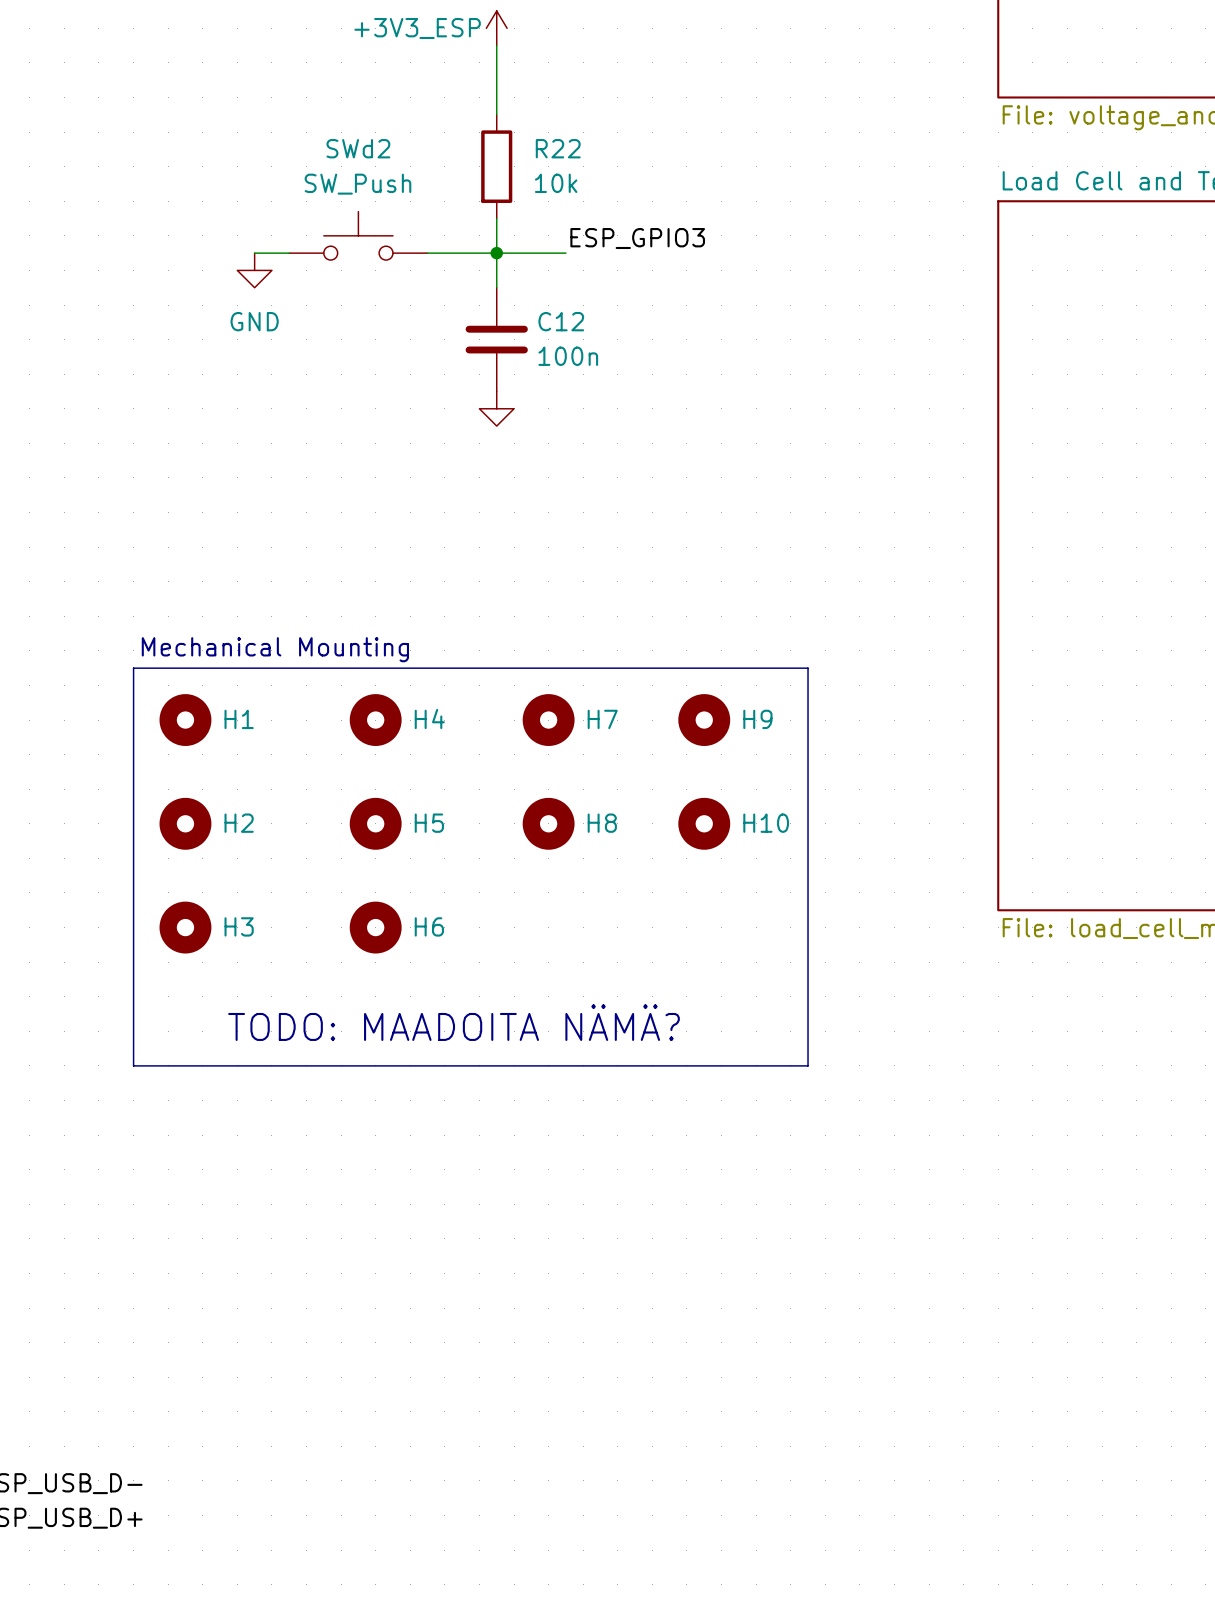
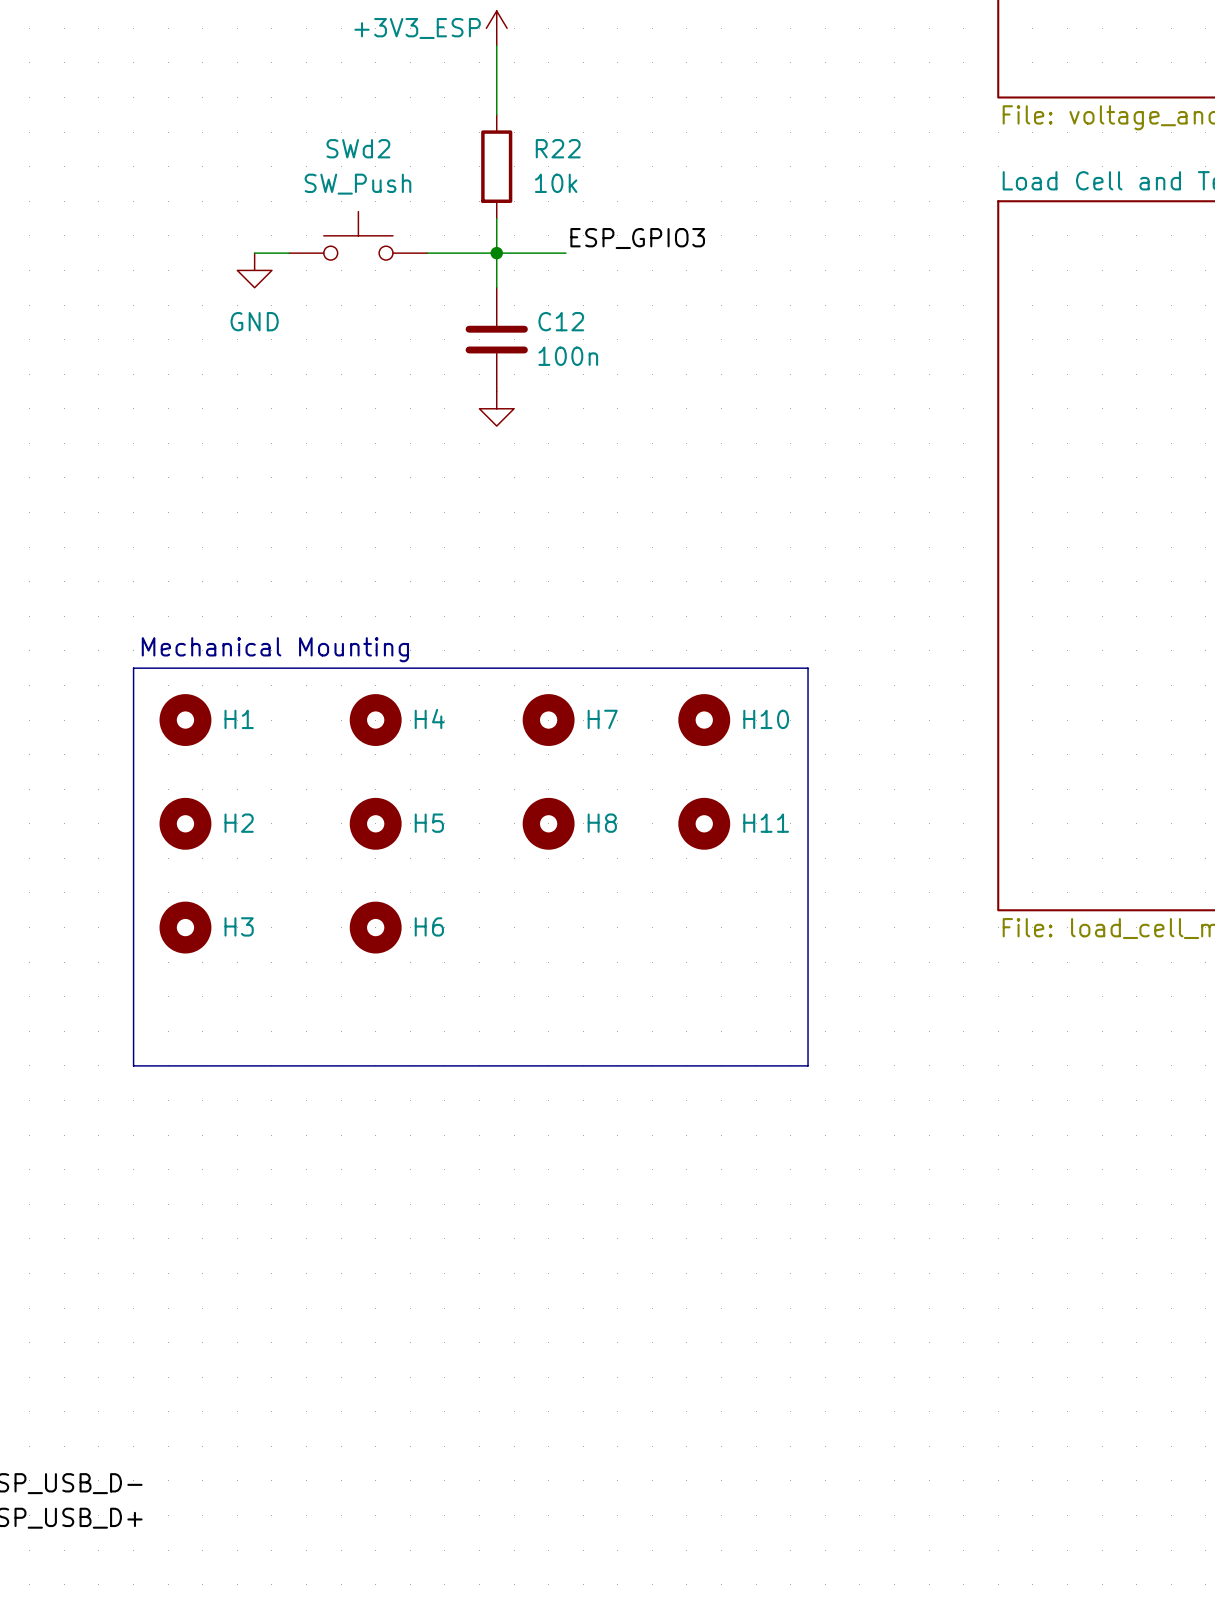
H9 name: H9 (757, 719) -> H10 (766, 719)
H10 name: H10 (766, 823) -> H11 (766, 823)
text: TODO: MAADOITA NÄMÄ? (454, 1022) -> none

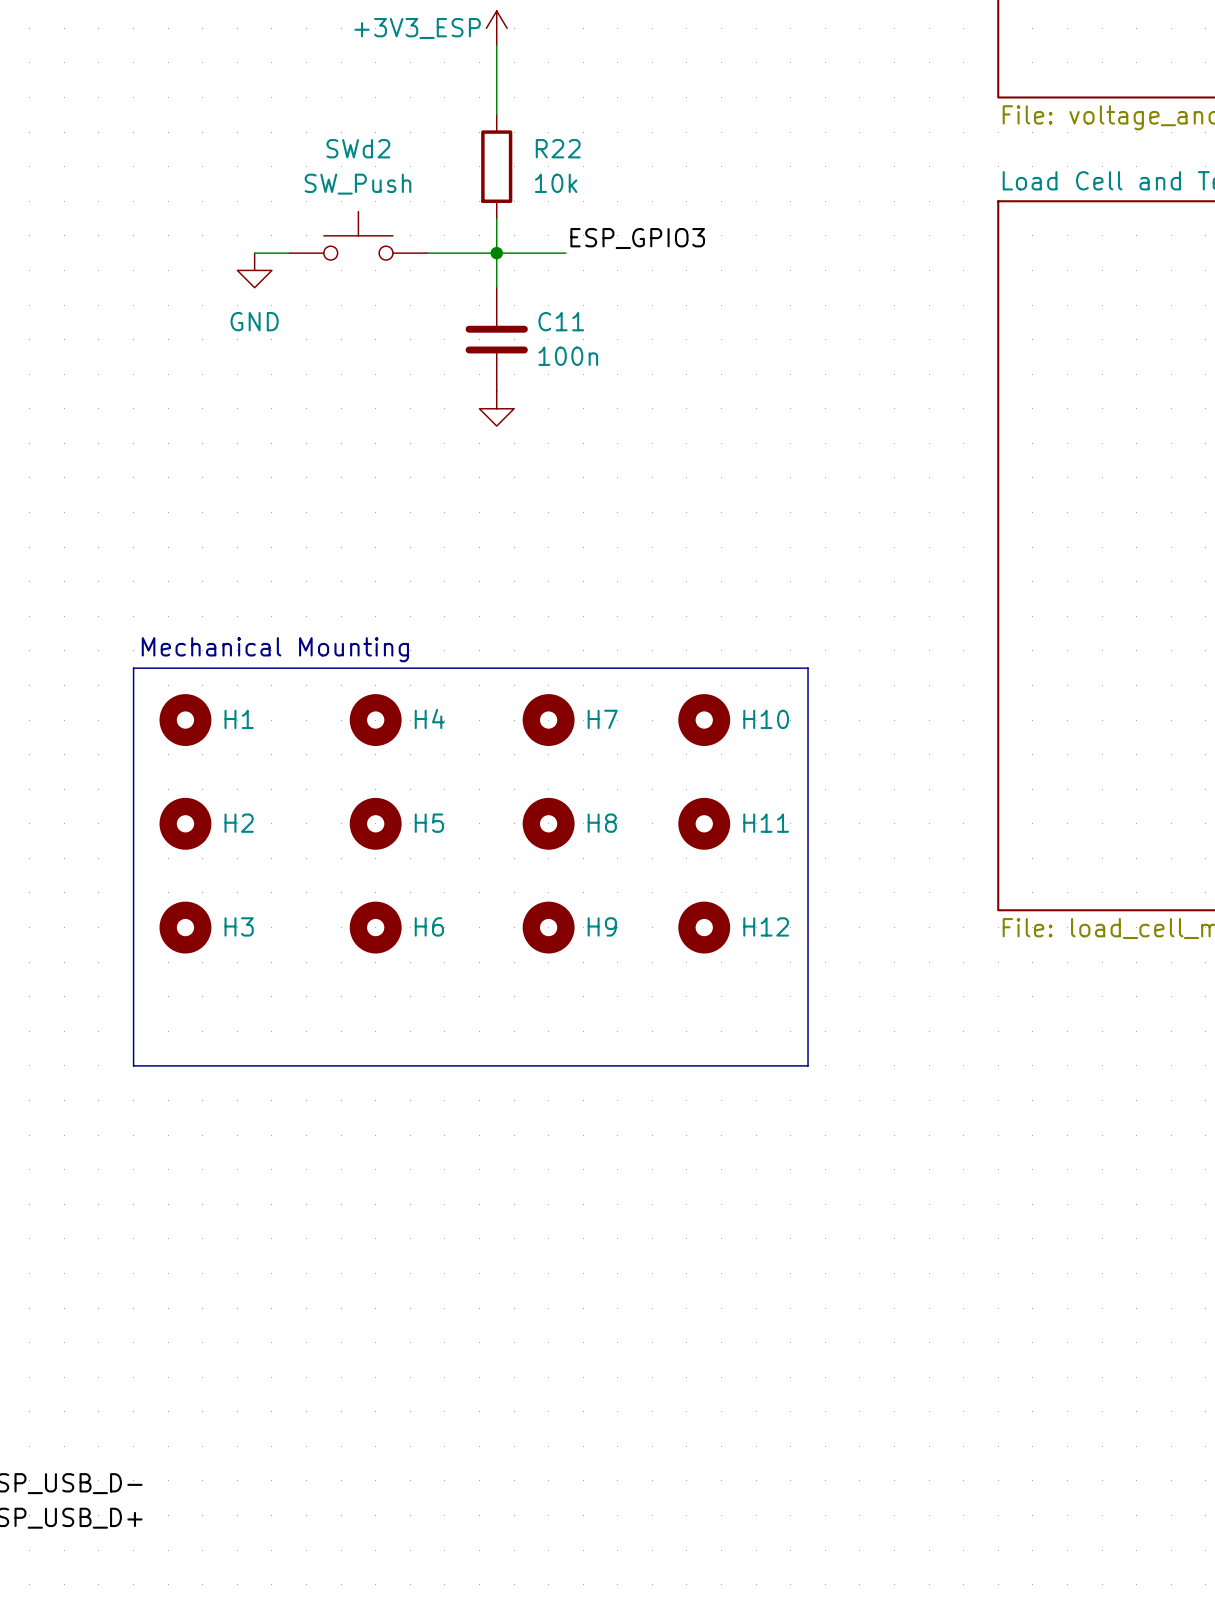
C12 name: C12 (561, 321) -> C11 (561, 321)
H9: none -> (548, 927)
H12: none -> (704, 927)

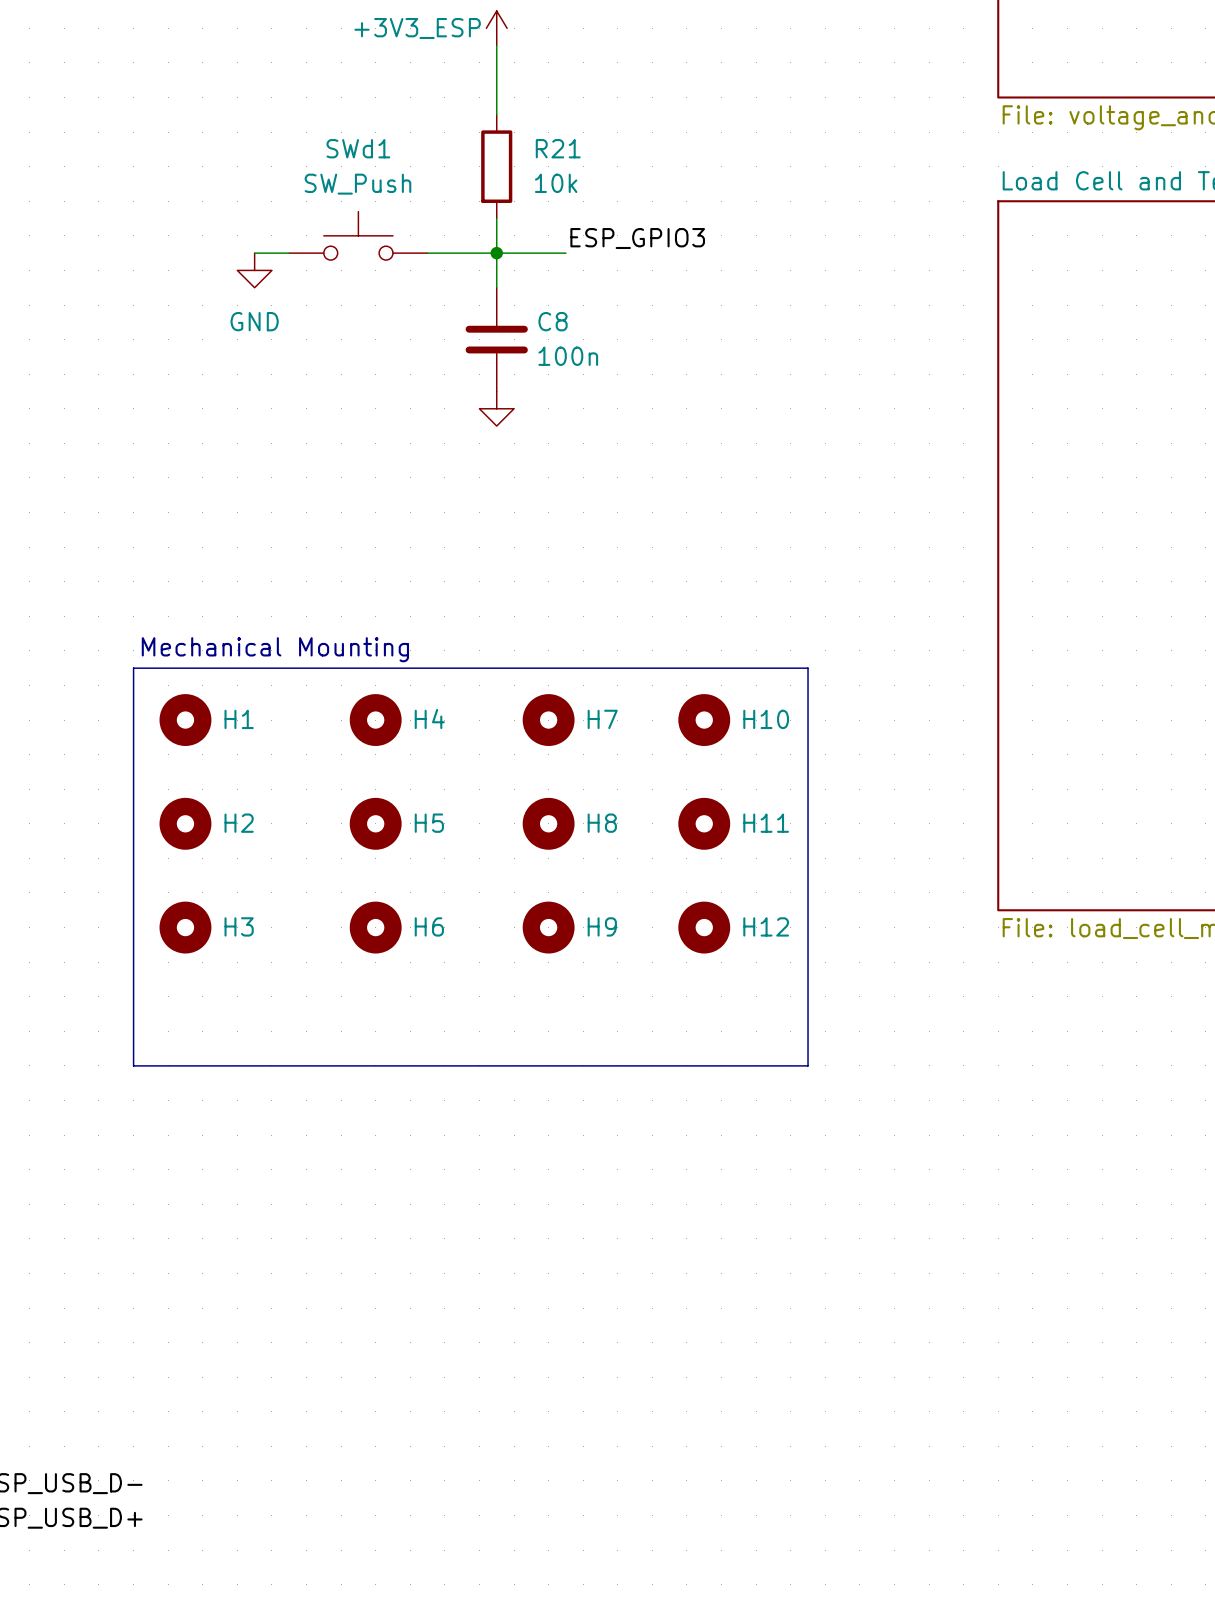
SWd2 name: SWd2 (358, 148) -> SWd1 (358, 148)
R22 name: R22 (558, 148) -> R21 (558, 148)
C11 name: C11 (561, 321) -> C8 (553, 321)

